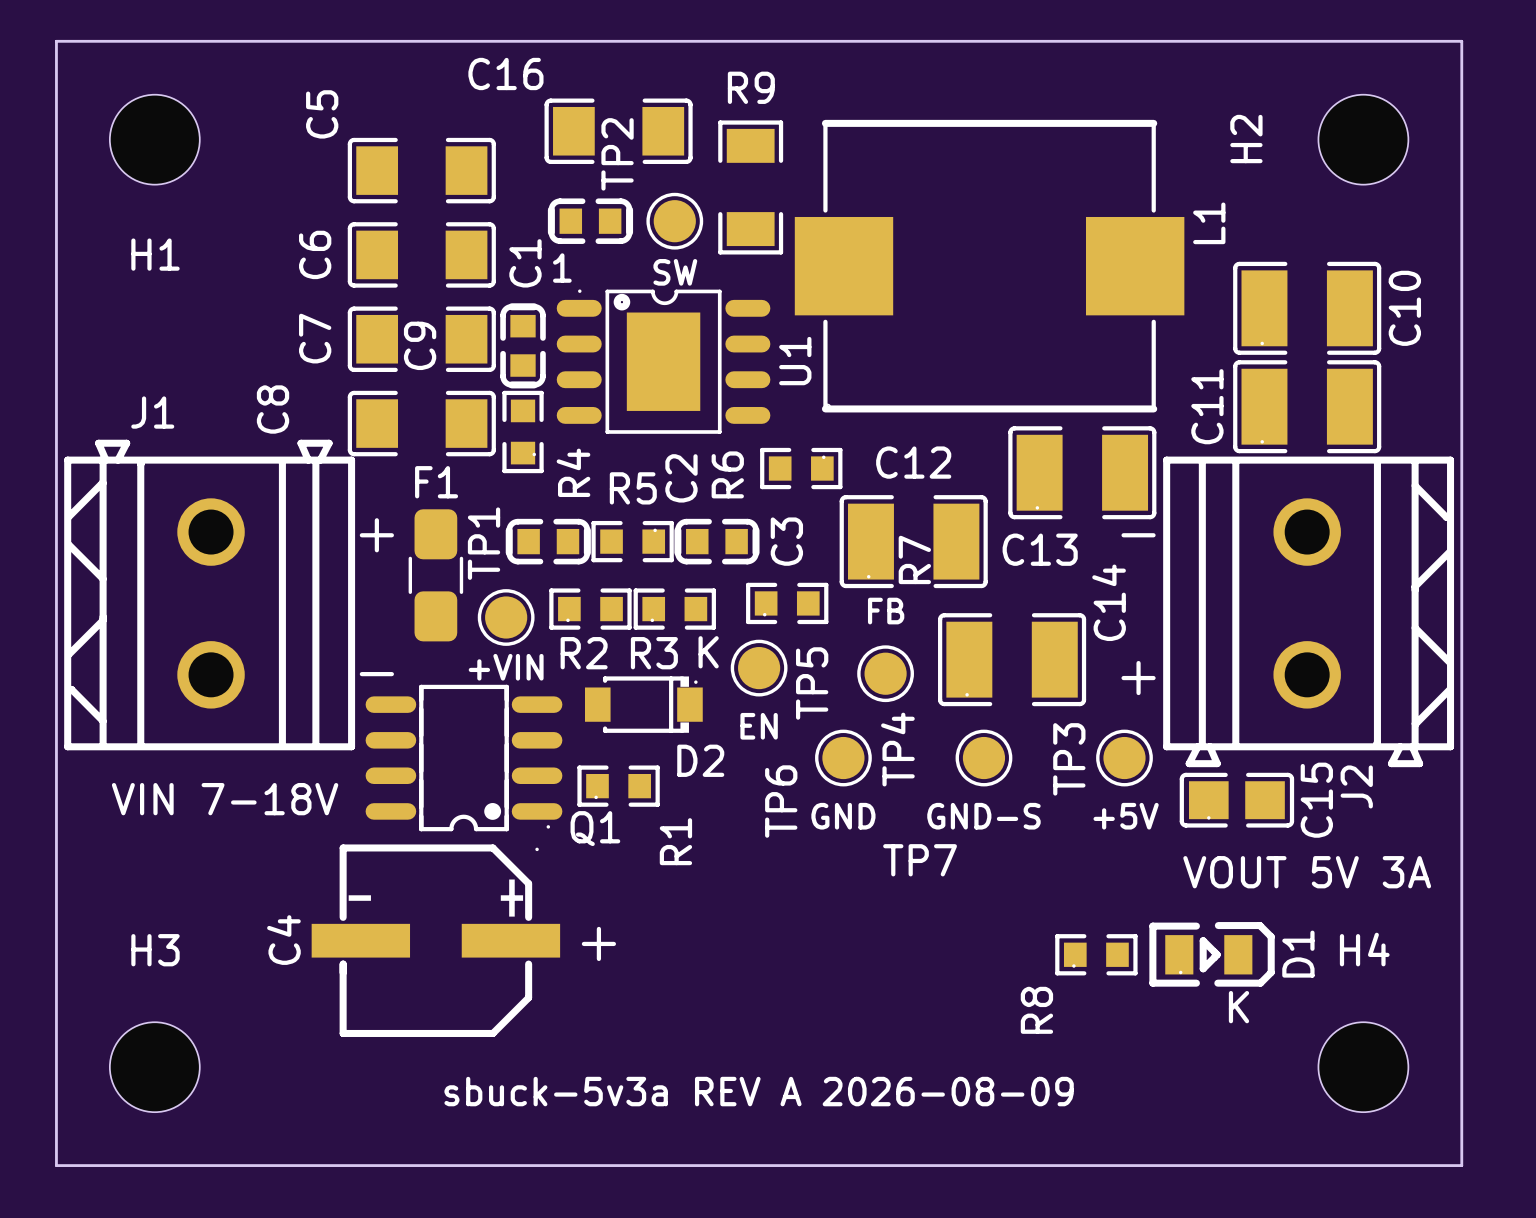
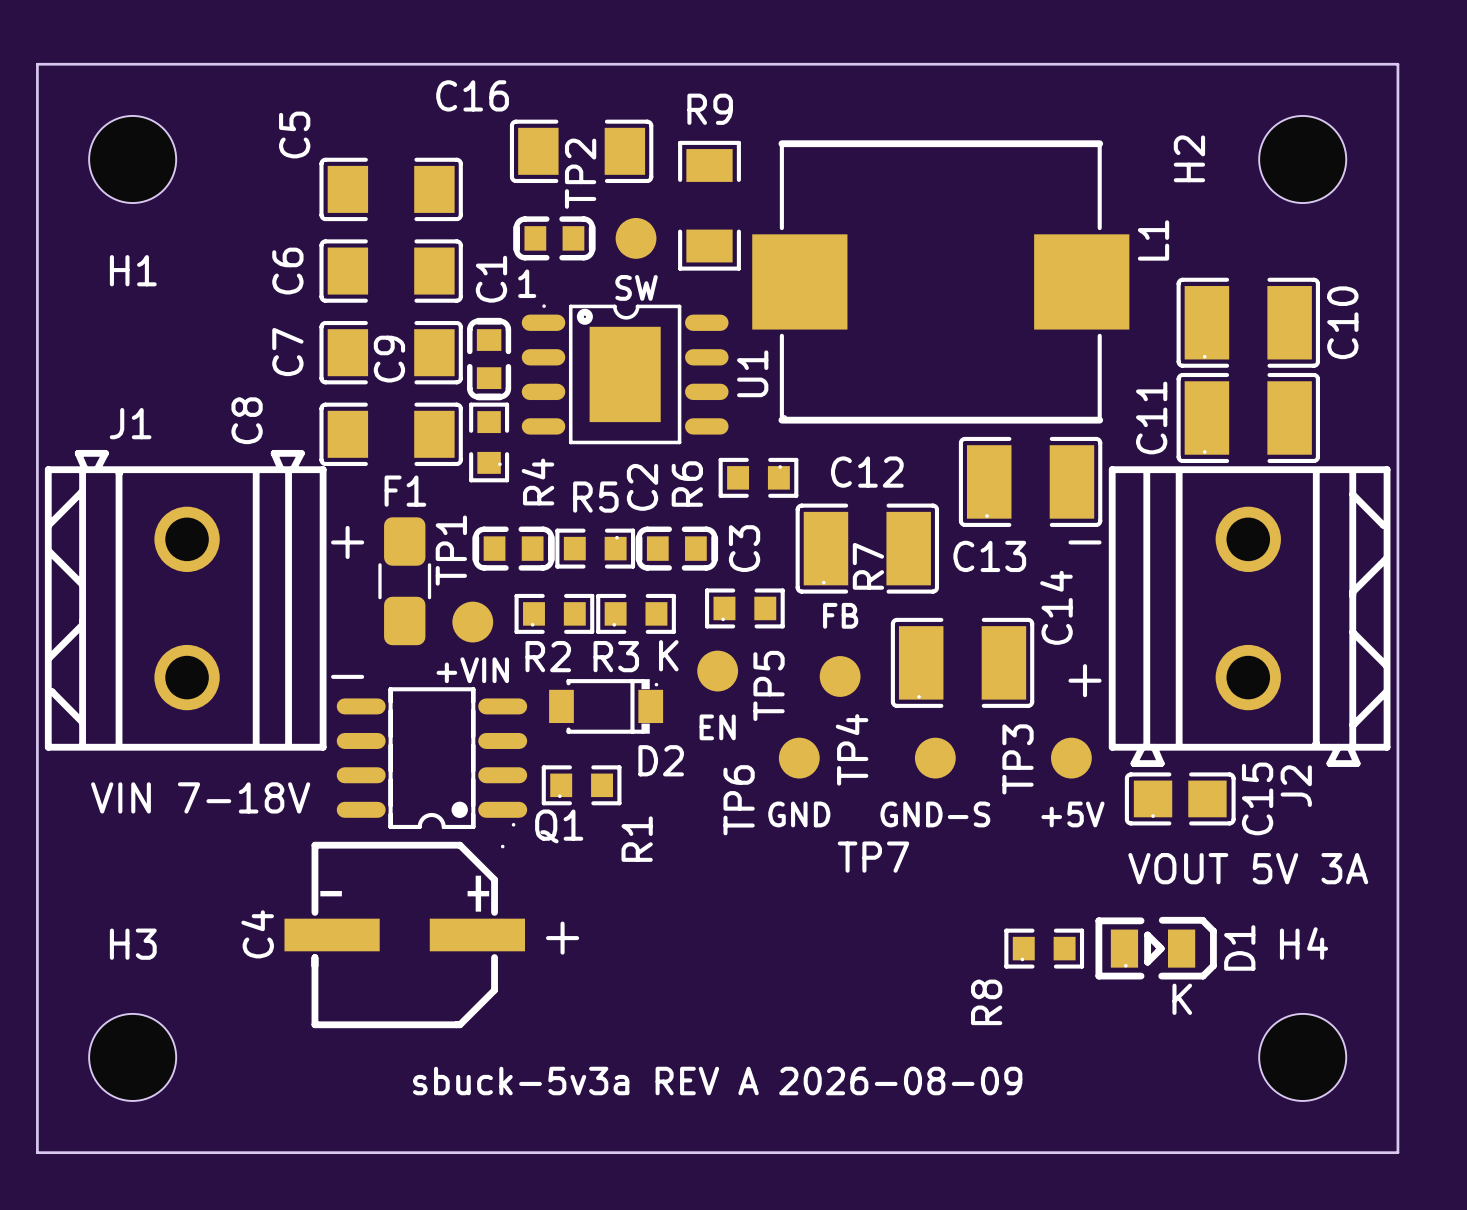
TP2 footprint: [646, 192, 704, 250] -> [615, 217, 657, 259]
TP1 footprint: [477, 589, 535, 646] -> [452, 601, 494, 643]
TP5 footprint: [730, 639, 788, 697] -> [697, 650, 739, 692]
TP4 footprint: [857, 645, 914, 703] -> [819, 656, 861, 697]
TP6 footprint: [815, 729, 872, 787] -> [778, 737, 820, 779]
TP7 footprint: [955, 729, 1013, 787] -> [914, 737, 956, 779]
TP3 footprint: [1096, 729, 1153, 787] -> [1050, 737, 1092, 779]

